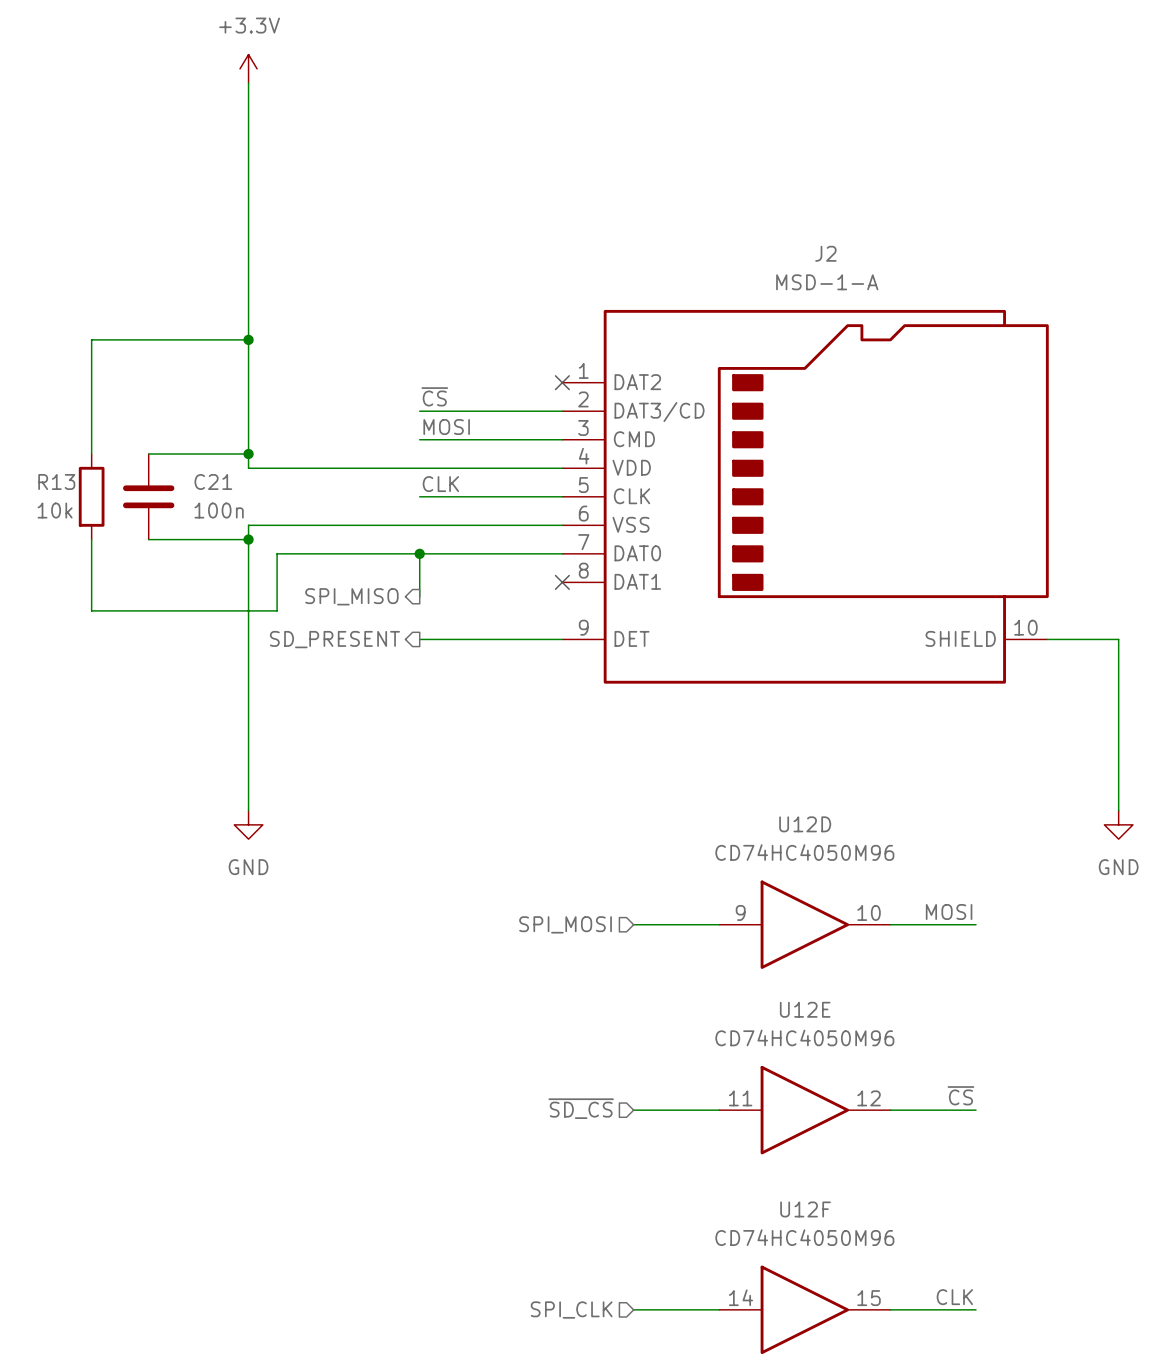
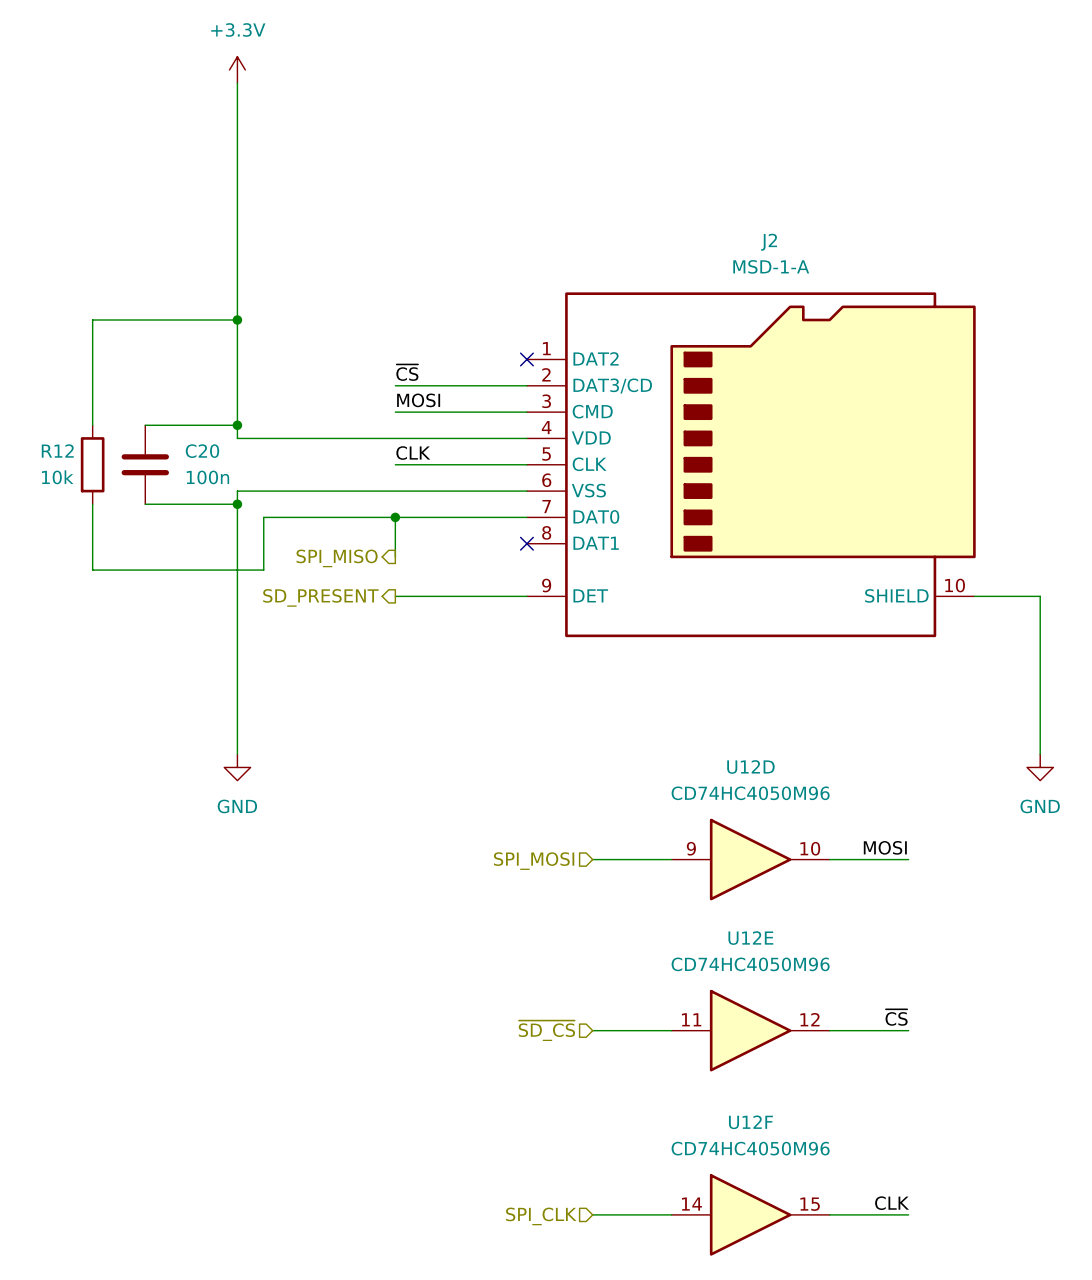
R13 name: R13 (56, 482) -> R12 (57, 450)
C21 name: C21 (213, 482) -> C20 (202, 451)

